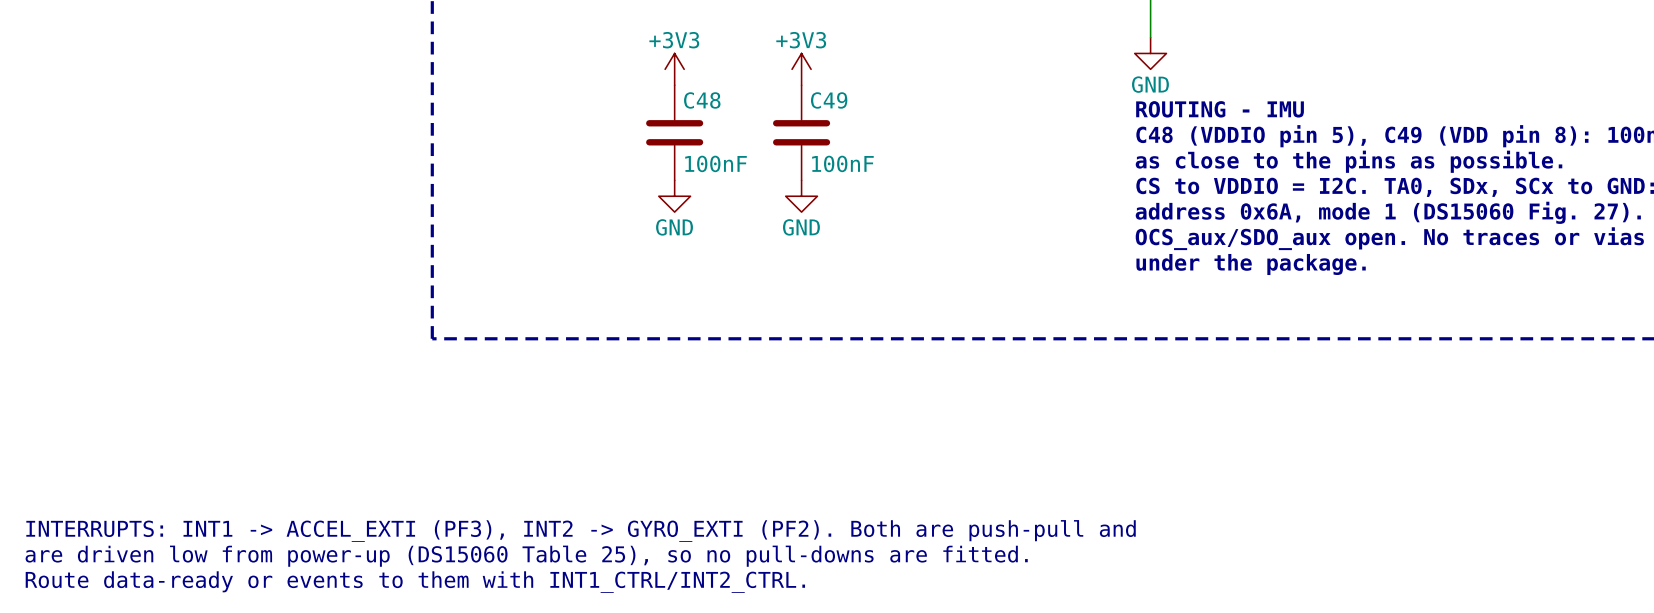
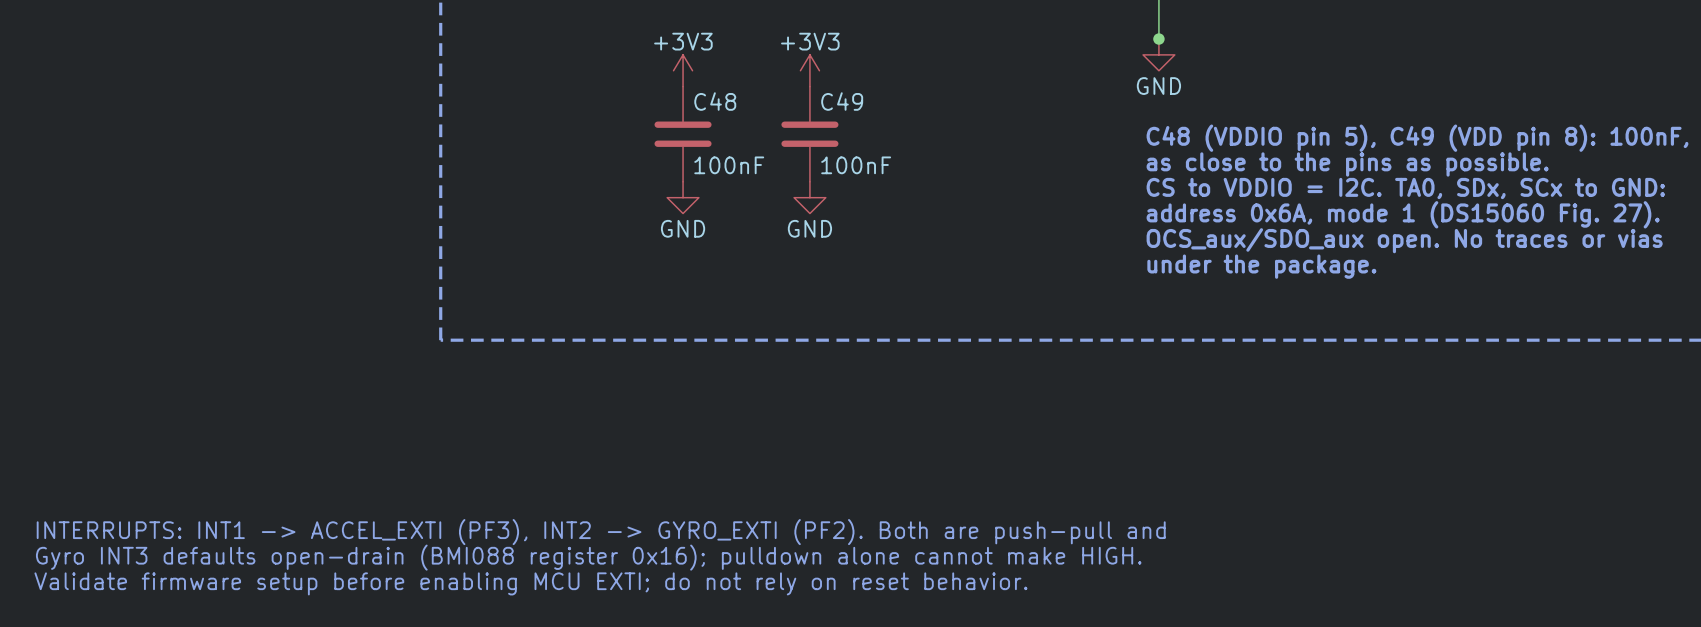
junction: none -> (1158, 39)
text: ROUTING - IMU (1220, 109) -> none
text: are driven low from power-up (DS15060 Table 25), so no pull-downs are fitted. (526, 556) -> Gyro INT3 defaults open-drain (BMI088 register 0x16); pulldown alone cannot make HIGH. (588, 557)
text: Route data-ready or events to them with INT1_CTRL/INT2_CTRL. (415, 582) -> Validate firmware setup before enabling MCU EXTI; do not rely on reset behavior. (530, 583)

